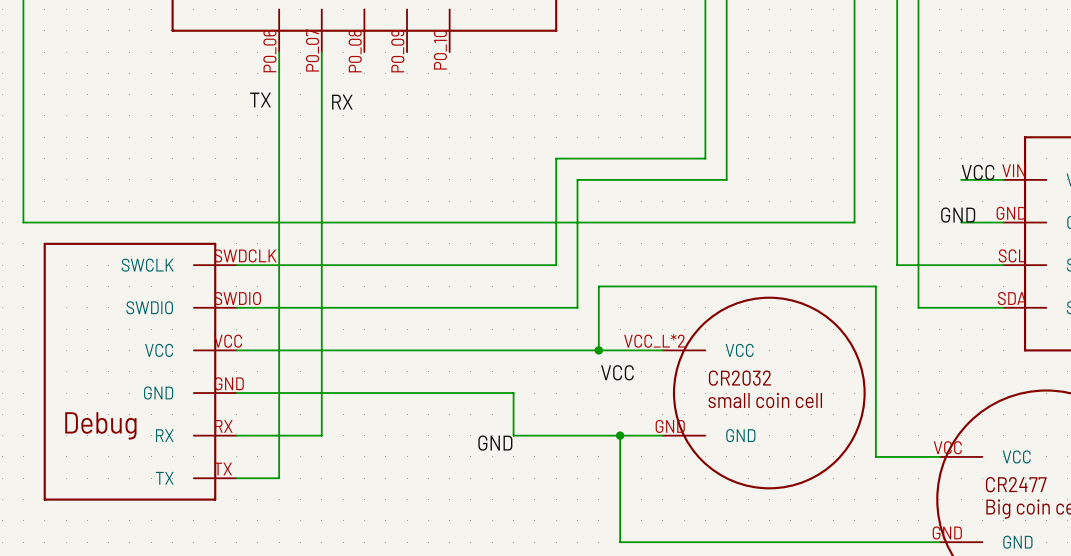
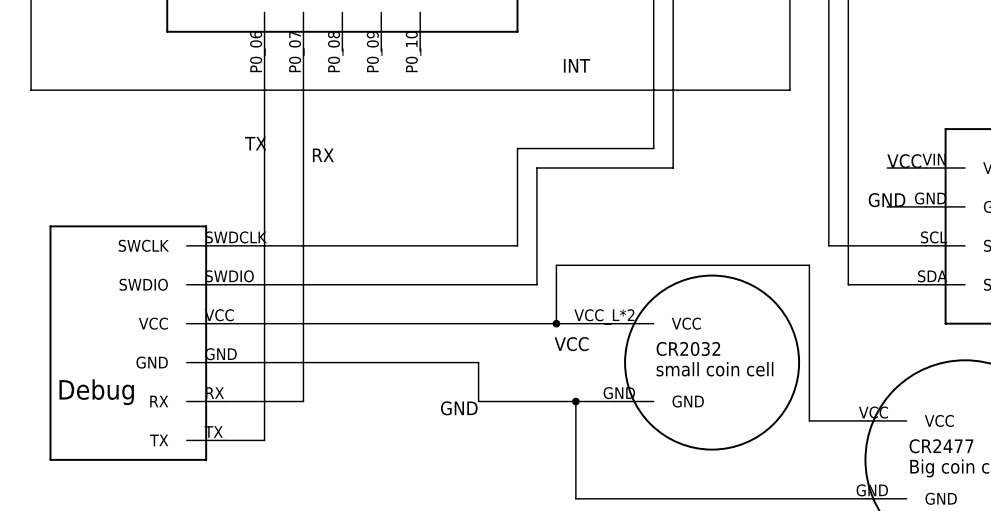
label: none -> INT (577, 65)
wire: (23, 94) (23, 222) (854, 222) (854, 94) -> (31, 90) (789, 90)
label position: TX (260, 99) -> TX (255, 143)
label position: RX (342, 102) -> RX (323, 155)

